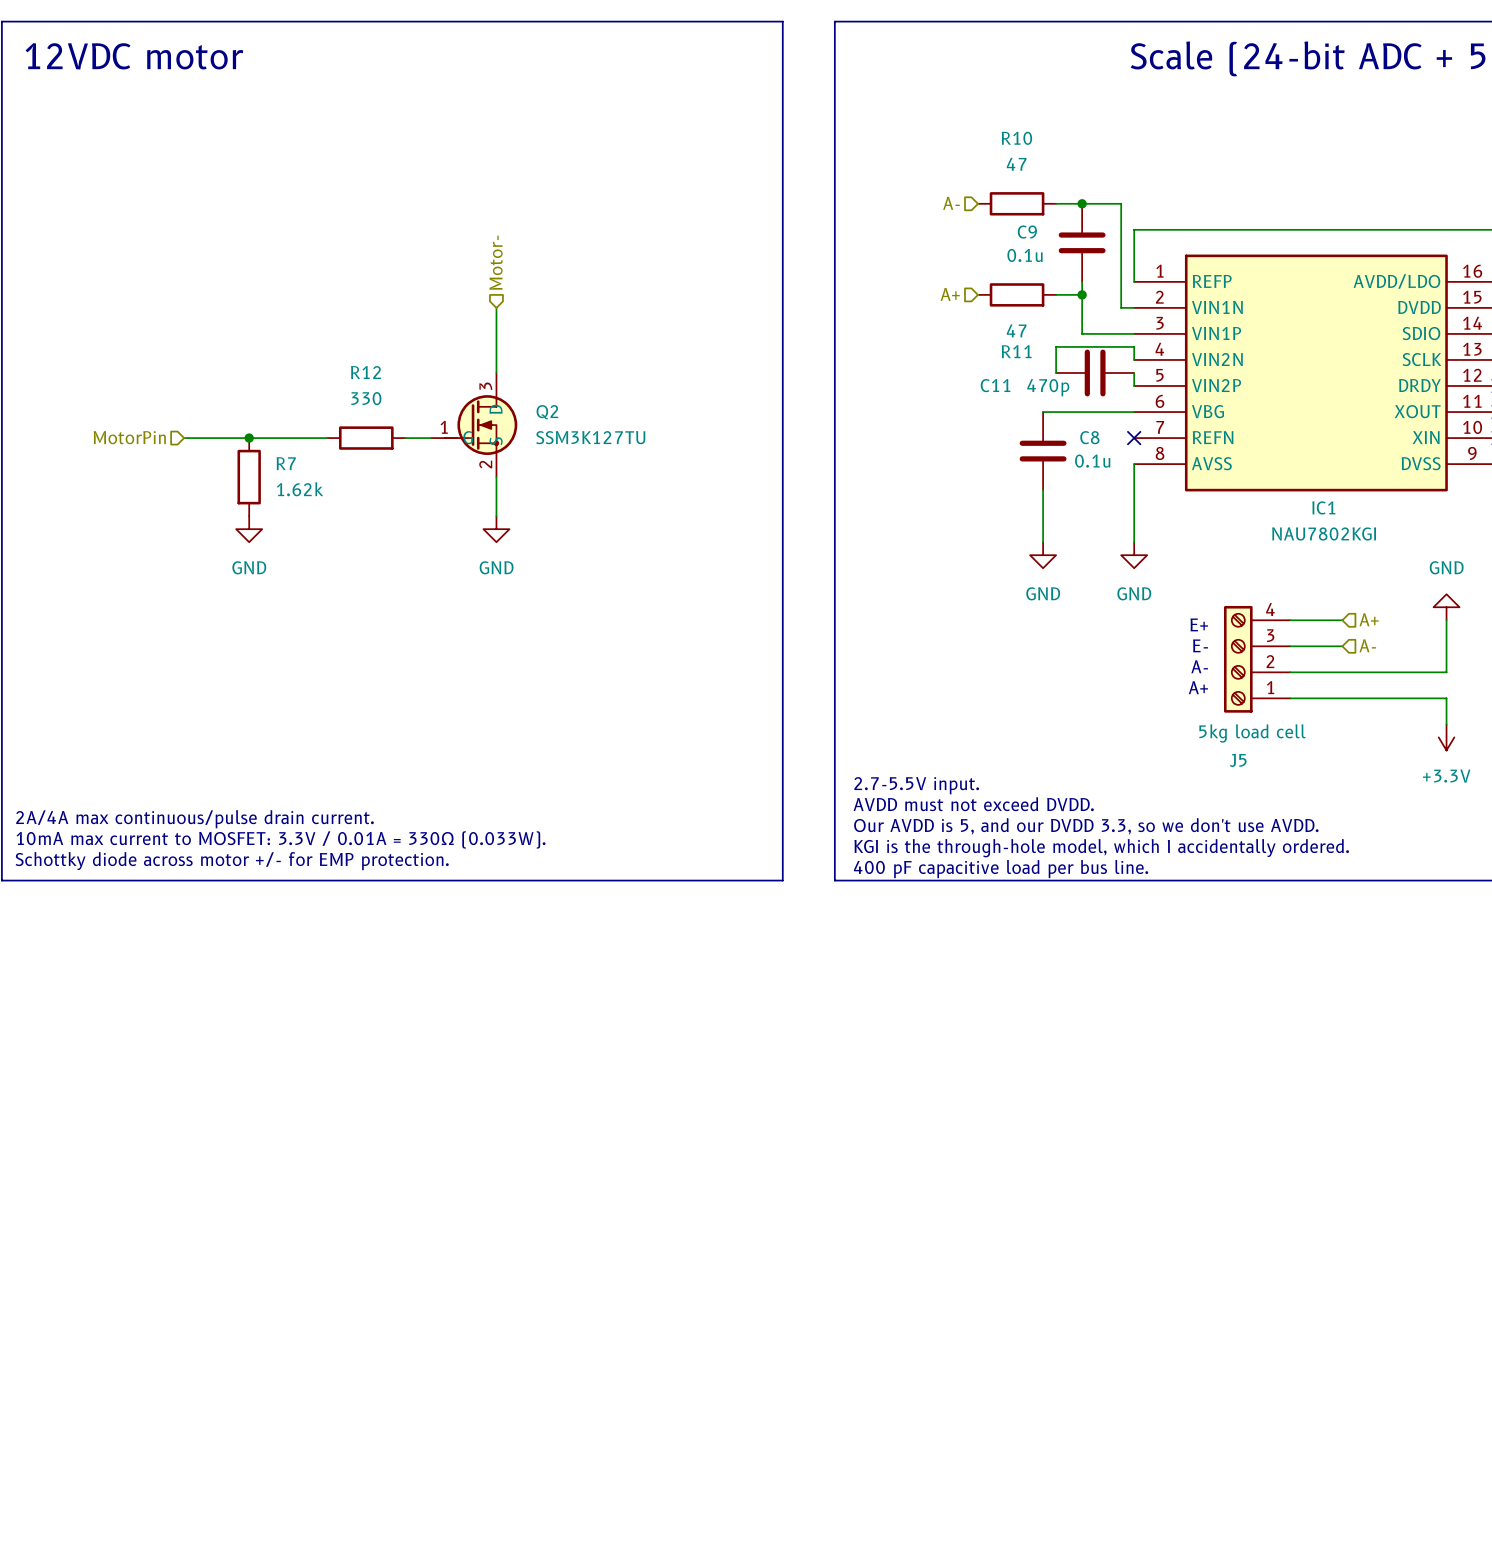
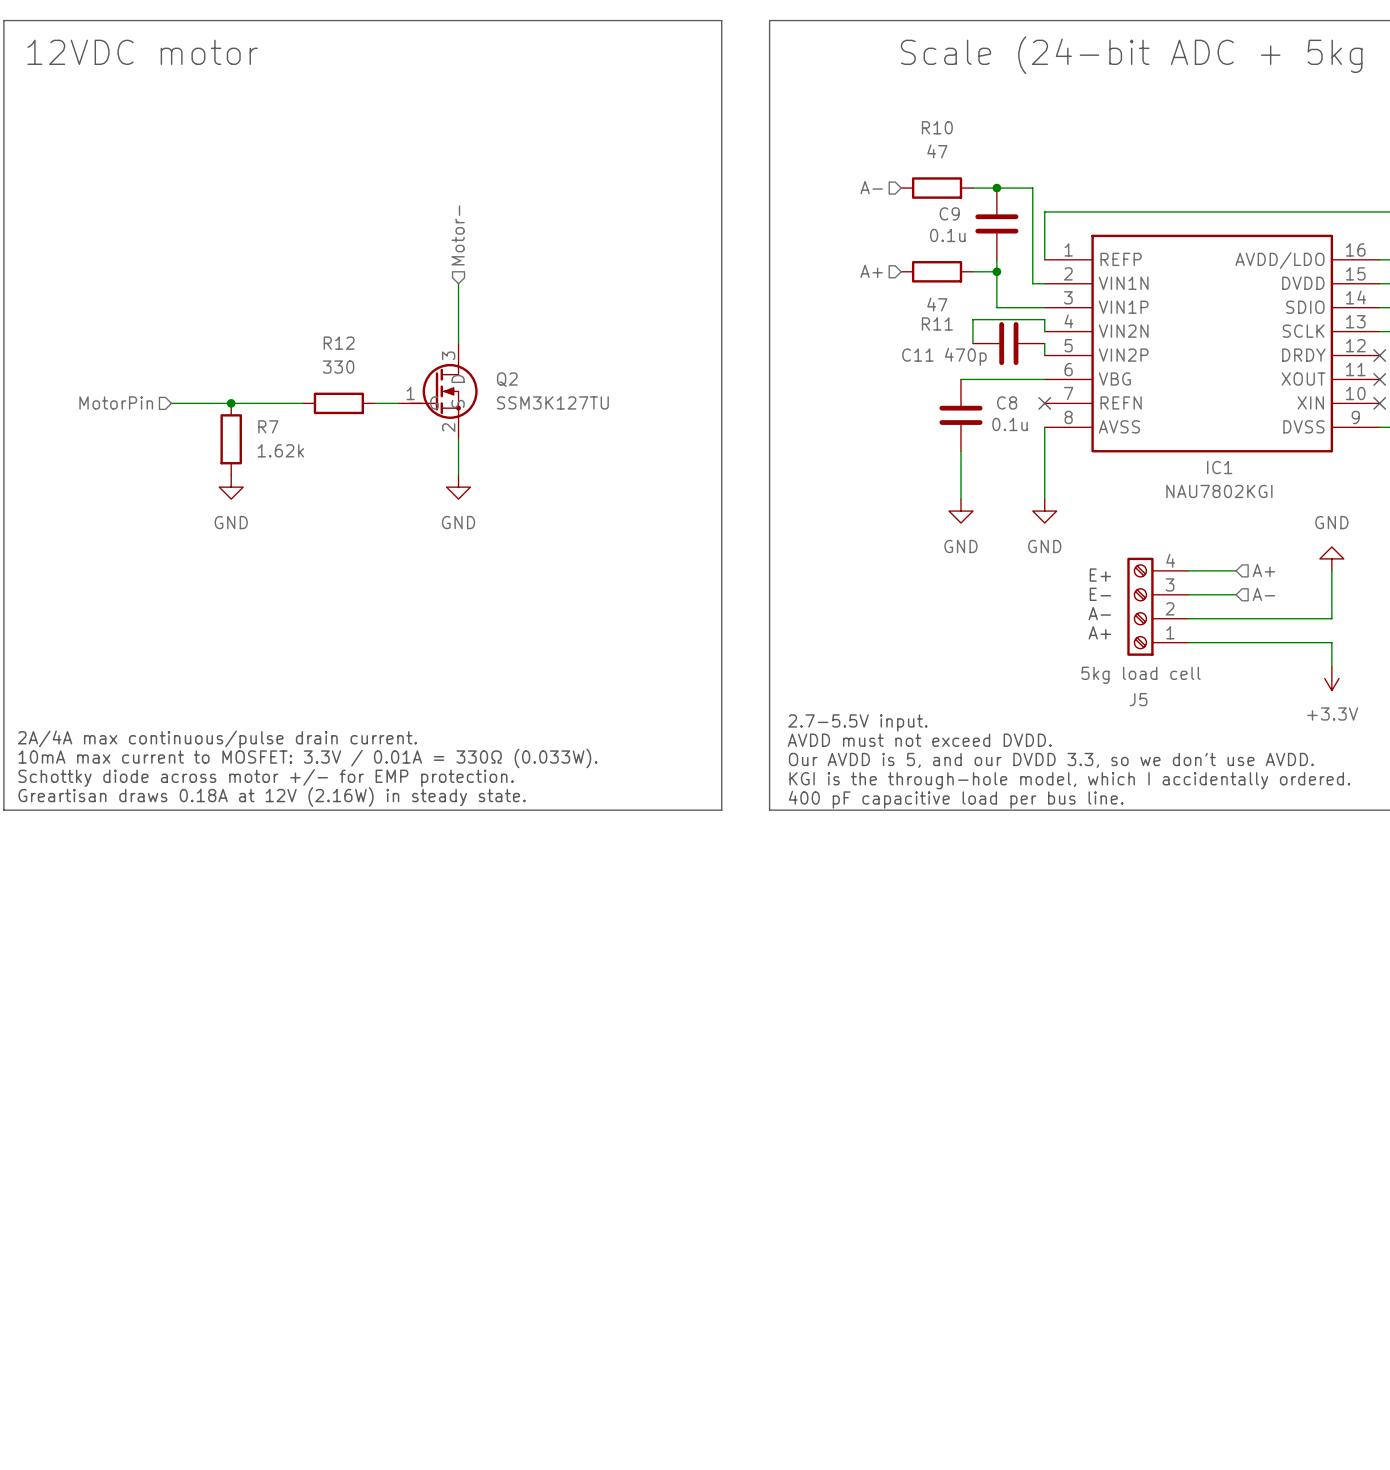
text: none -> 2A/4A max continuous/pulse drain current. (217, 739)
text: 2A/4A max continuous/pulse drain current. (195, 819) -> 10mA max current to MOSFET: 3.3V / 0.01A = 330Ω (0.033W). (307, 758)
text: 10mA max current to MOSFET: 3.3V / 0.01A = 330Ω (0.033W). (281, 839) -> Schottky diode across motor +/- for EMP protection. (266, 778)
text: Schottky diode across motor +/- for EMP protection. (232, 861) -> Greartisan draws 0.18A at 12V (2.16W) in steady state. (272, 796)

